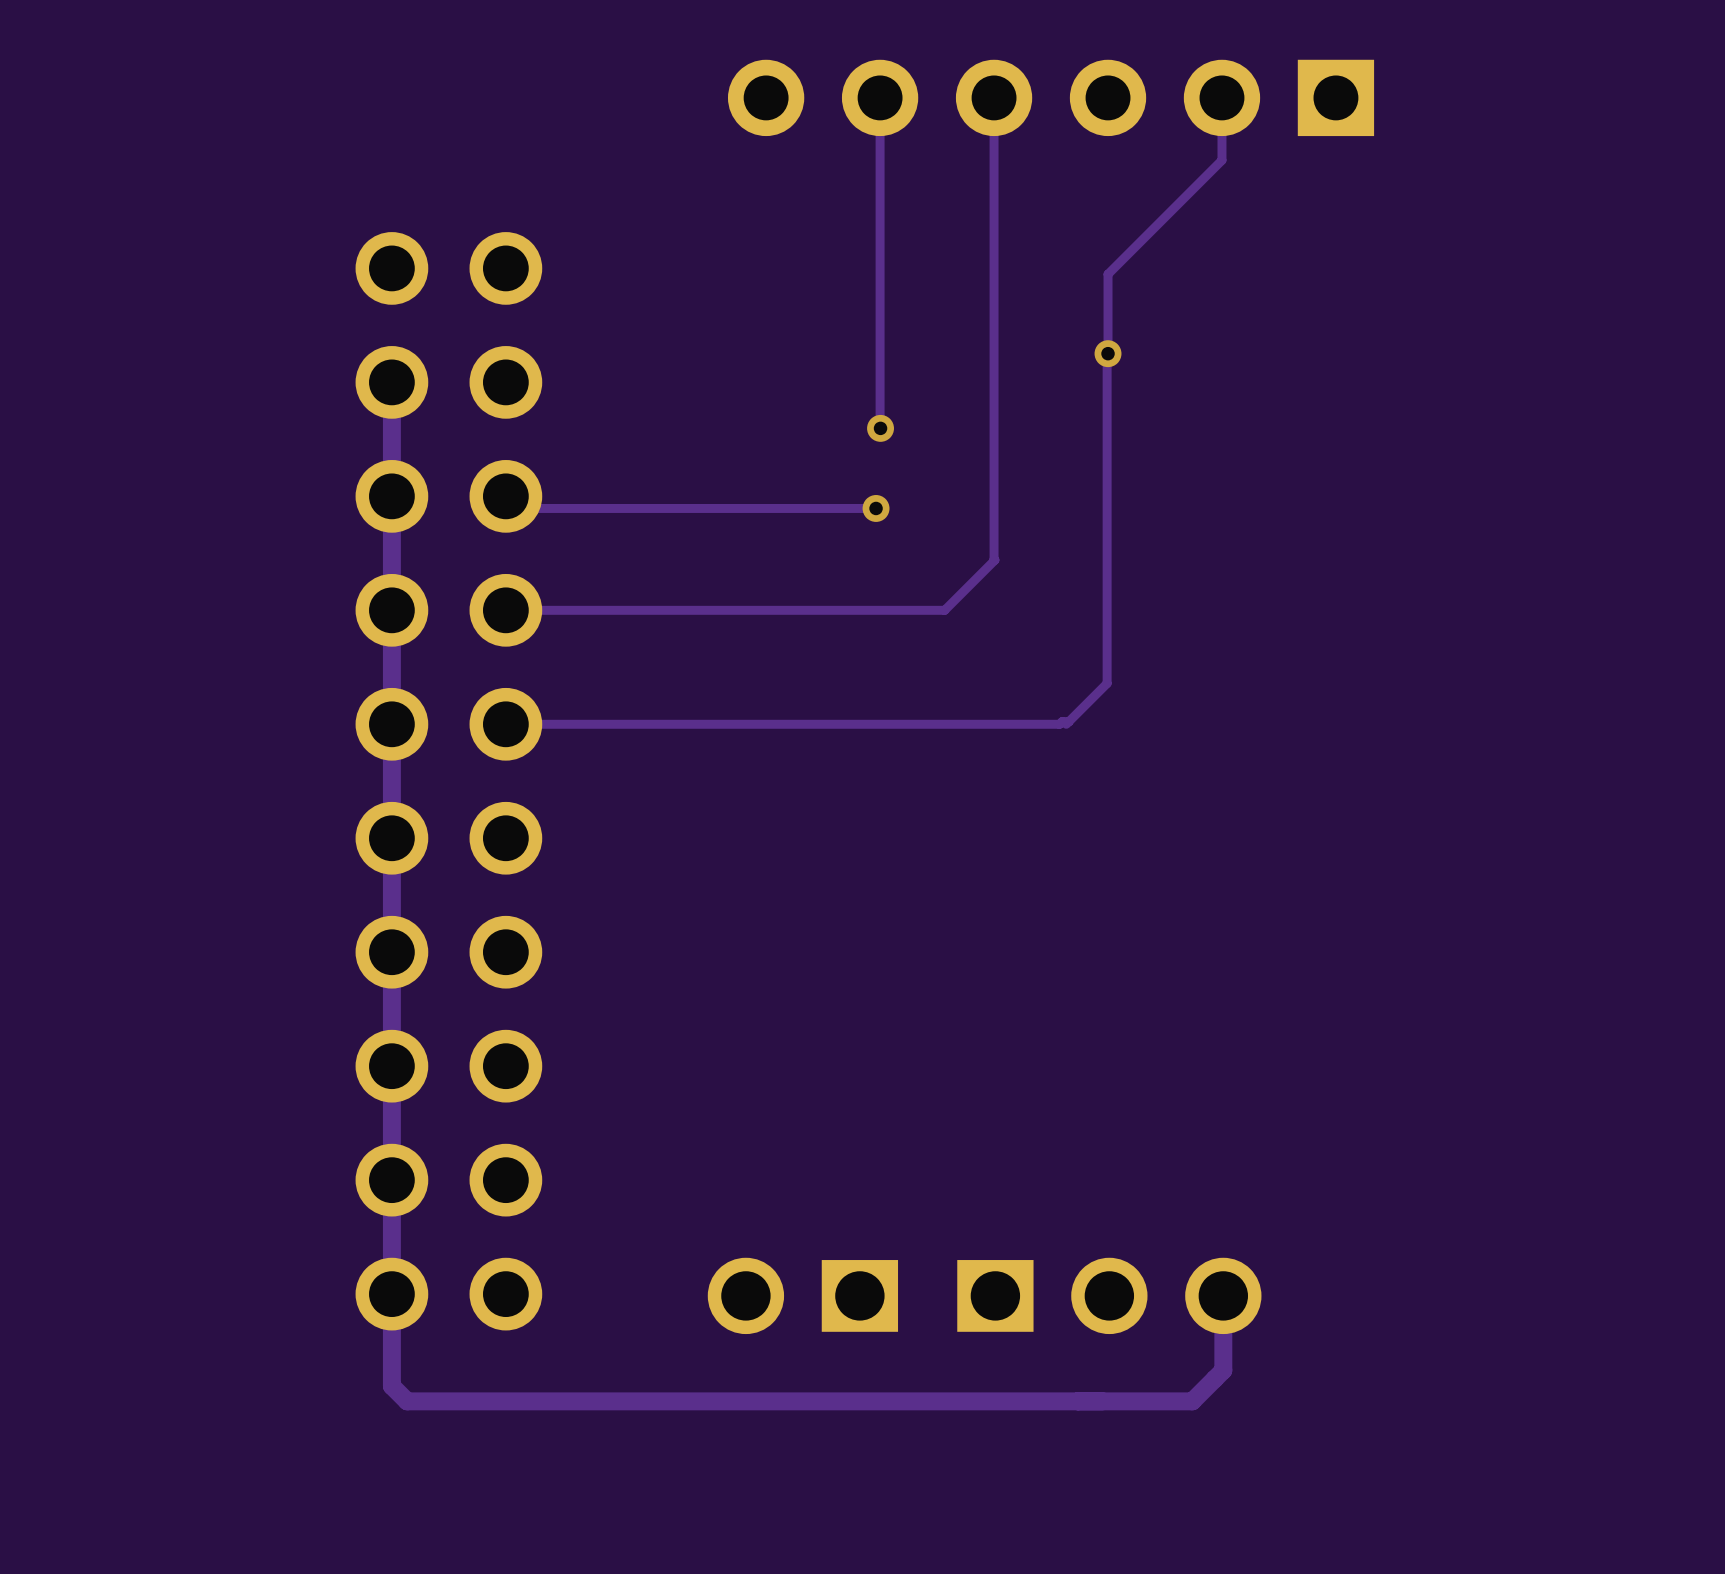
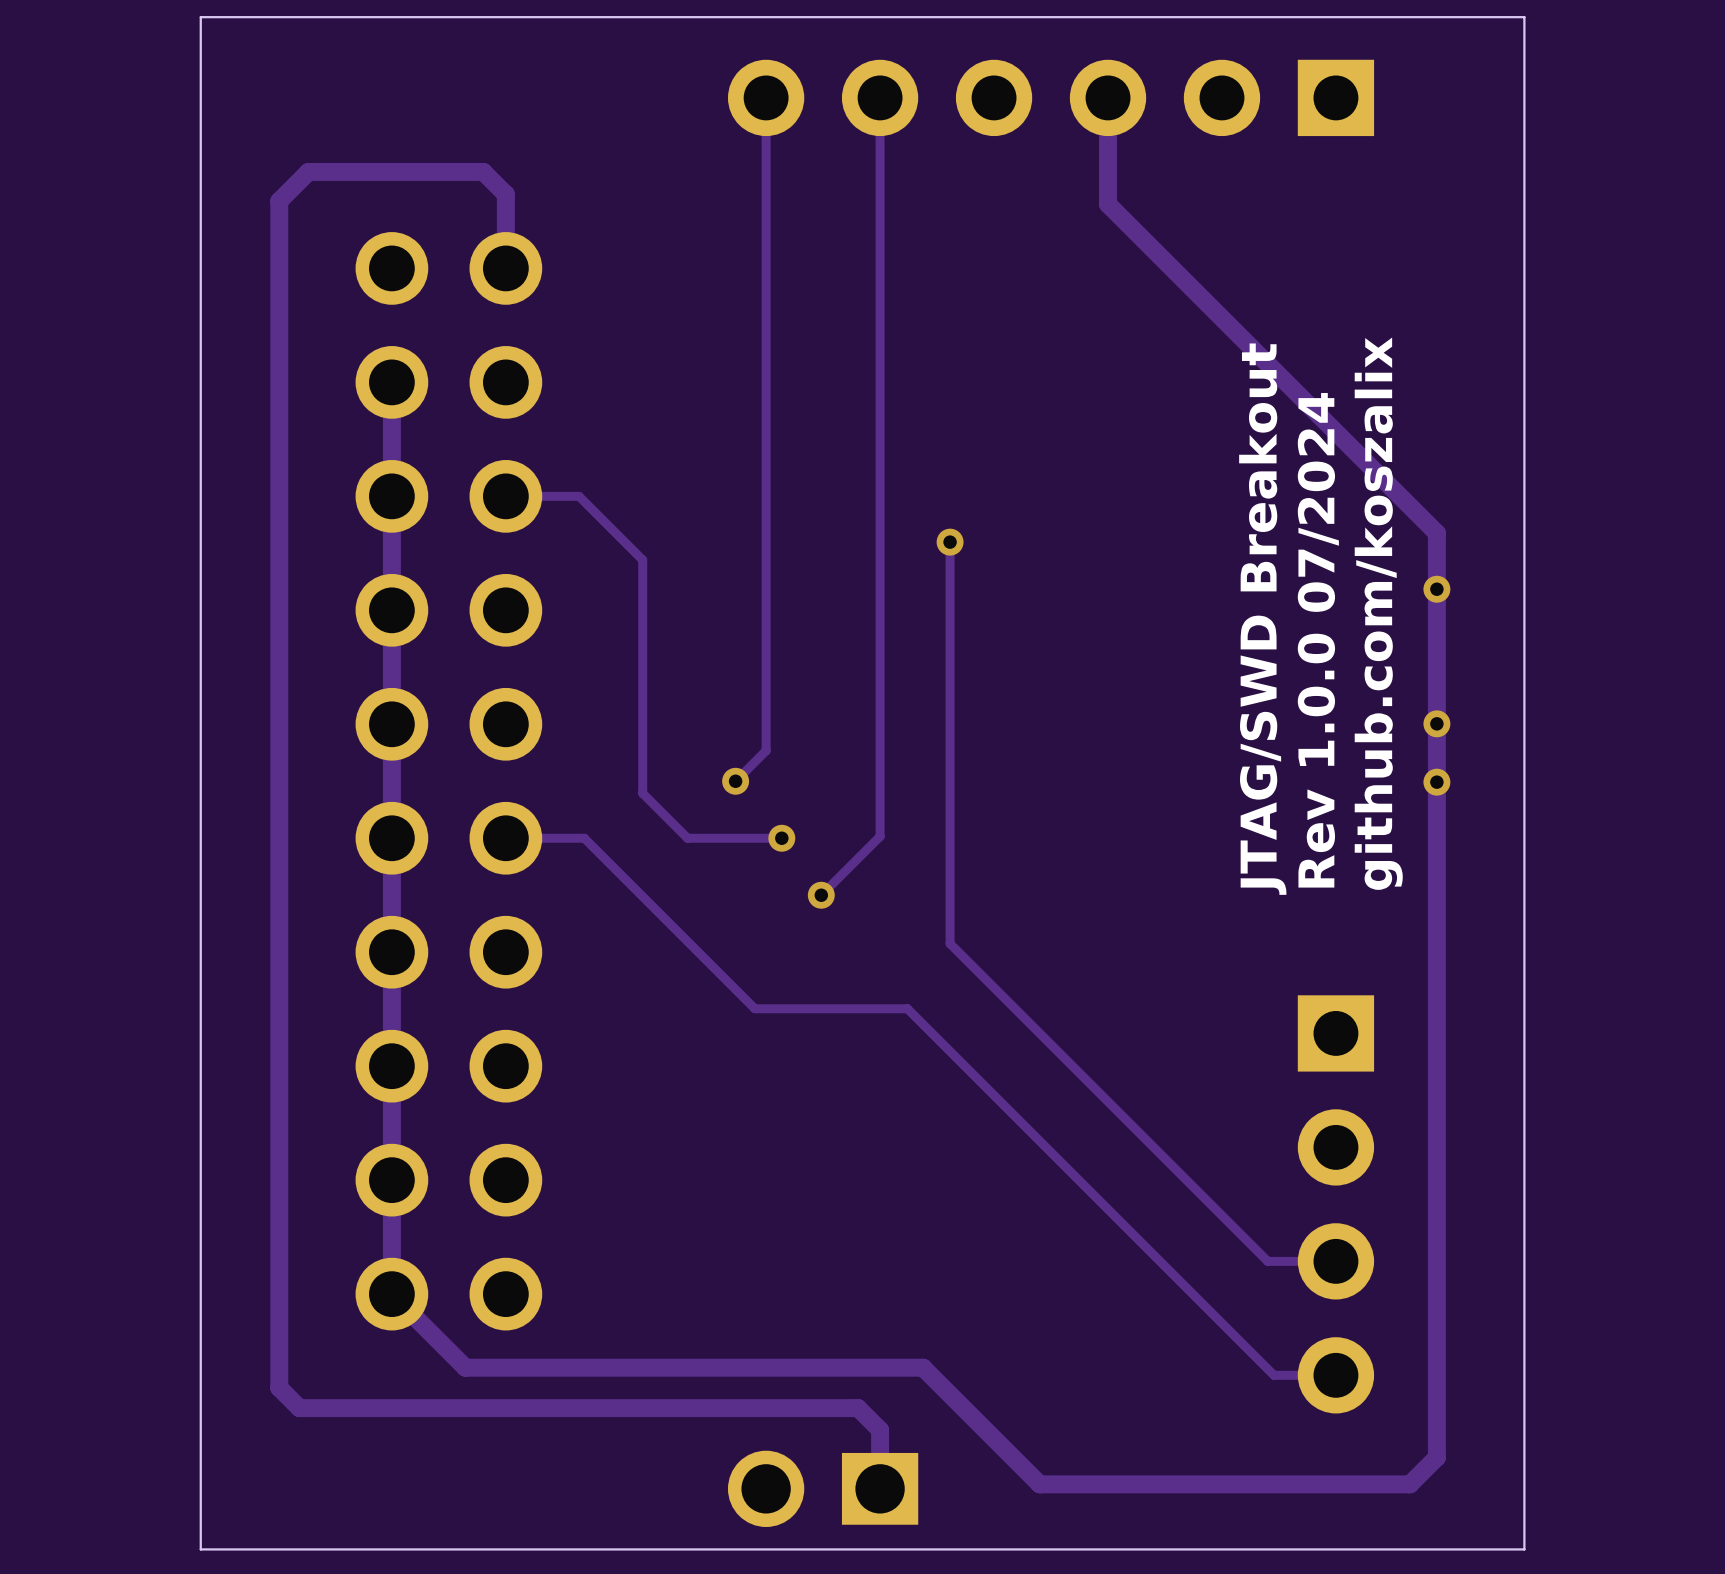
board edge: none -> (1524, 17) (200, 17) (200, 1549) (1524, 1549) (1524, 17)
track: none -> (766, 97) (766, 750) (735, 781)
track: (994, 97) (994, 560) (944, 610) (505, 610) -> none
track: (1221, 97) (1221, 160) (1108, 274) (1107, 683) (1066, 724) -> none
track: none -> (505, 268) (505, 194) (483, 171) (308, 171) (279, 201) (279, 1387) (299, 1408) (858, 1408) (880, 1430) (880, 1488)
via: (1108, 353) -> none
track: none -> (880, 427) (880, 836) (821, 895)
via: (880, 428) -> none
track: (505, 496) (517, 508) (876, 508) -> (505, 496) (579, 496) (642, 560) (642, 793) (687, 838) (781, 838)
via: (876, 508) -> none
via: none -> (950, 542)
track: none -> (947, 544) (950, 542) (950, 943) (1267, 1261) (1335, 1261)
via: none -> (1436, 589)
text: none -> github.com/koszalix (1378, 613)
text: none -> JTAG/SWD Breakout (1262, 619)
text: none -> Rev 1.0.0 07/2024 (1318, 640)
track: (1068, 721) (1062, 721) (1059, 724) (505, 724) -> none
via: none -> (1436, 723)
via: none -> (735, 781)
via: none -> (1436, 782)
track: none -> (505, 838) (584, 838) (754, 1008) (907, 1008) (1274, 1375) (1335, 1375)
via: none -> (781, 838)
via: none -> (821, 895)
part: none -> (1335, 1204)
track: (391, 1294) (391, 1386) (407, 1401) (1192, 1401) (1223, 1370) (1223, 1295) -> (391, 1294) (465, 1367) (923, 1367) (1039, 1484) (1409, 1484) (1436, 1457) (1436, 533) (1108, 204) (1108, 97)
part position: (802, 1295) -> (823, 1488)
part: (1109, 1295) -> none

